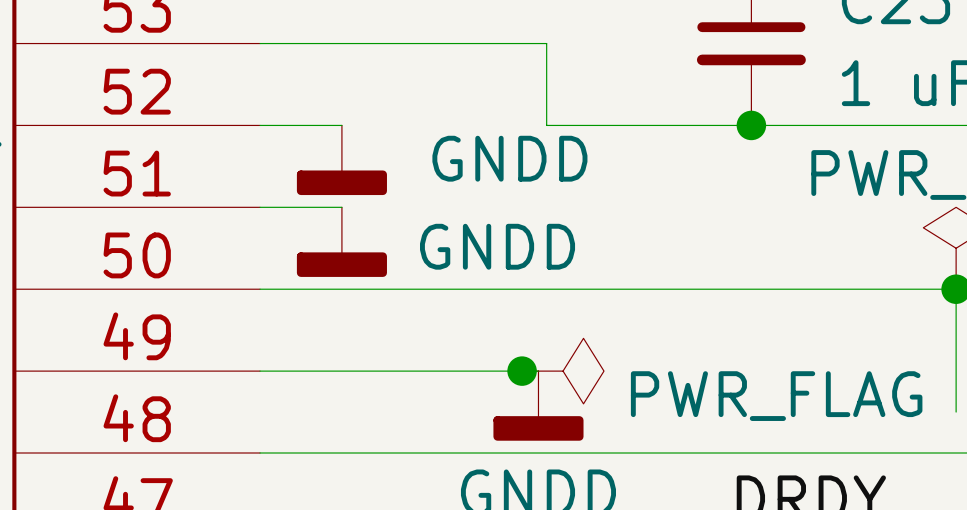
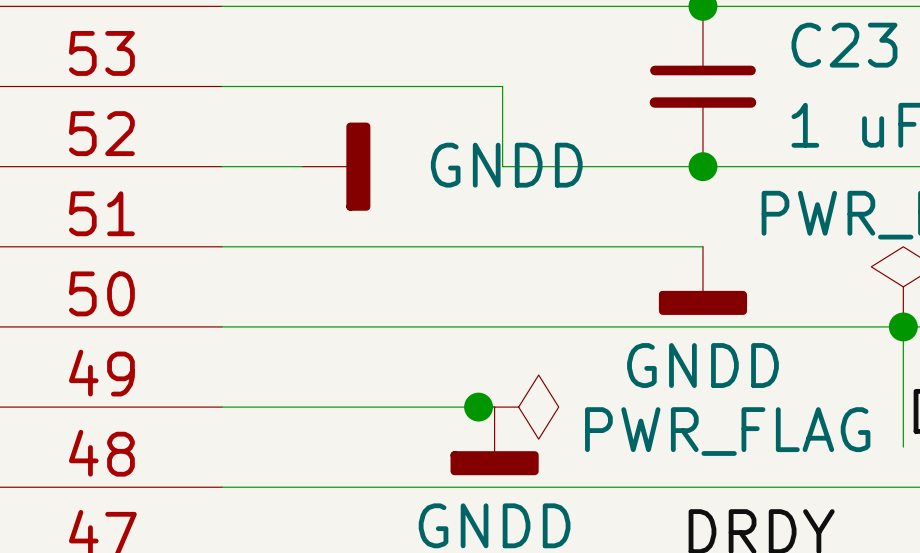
power symbol rotation: 0° (341, 160) -> 90° counterclockwise (336, 166)
wire: none -> (302, 246) (702, 246)
power symbol: GNDD (341, 242) -> none
power symbol: none -> GNDD (702, 280)

